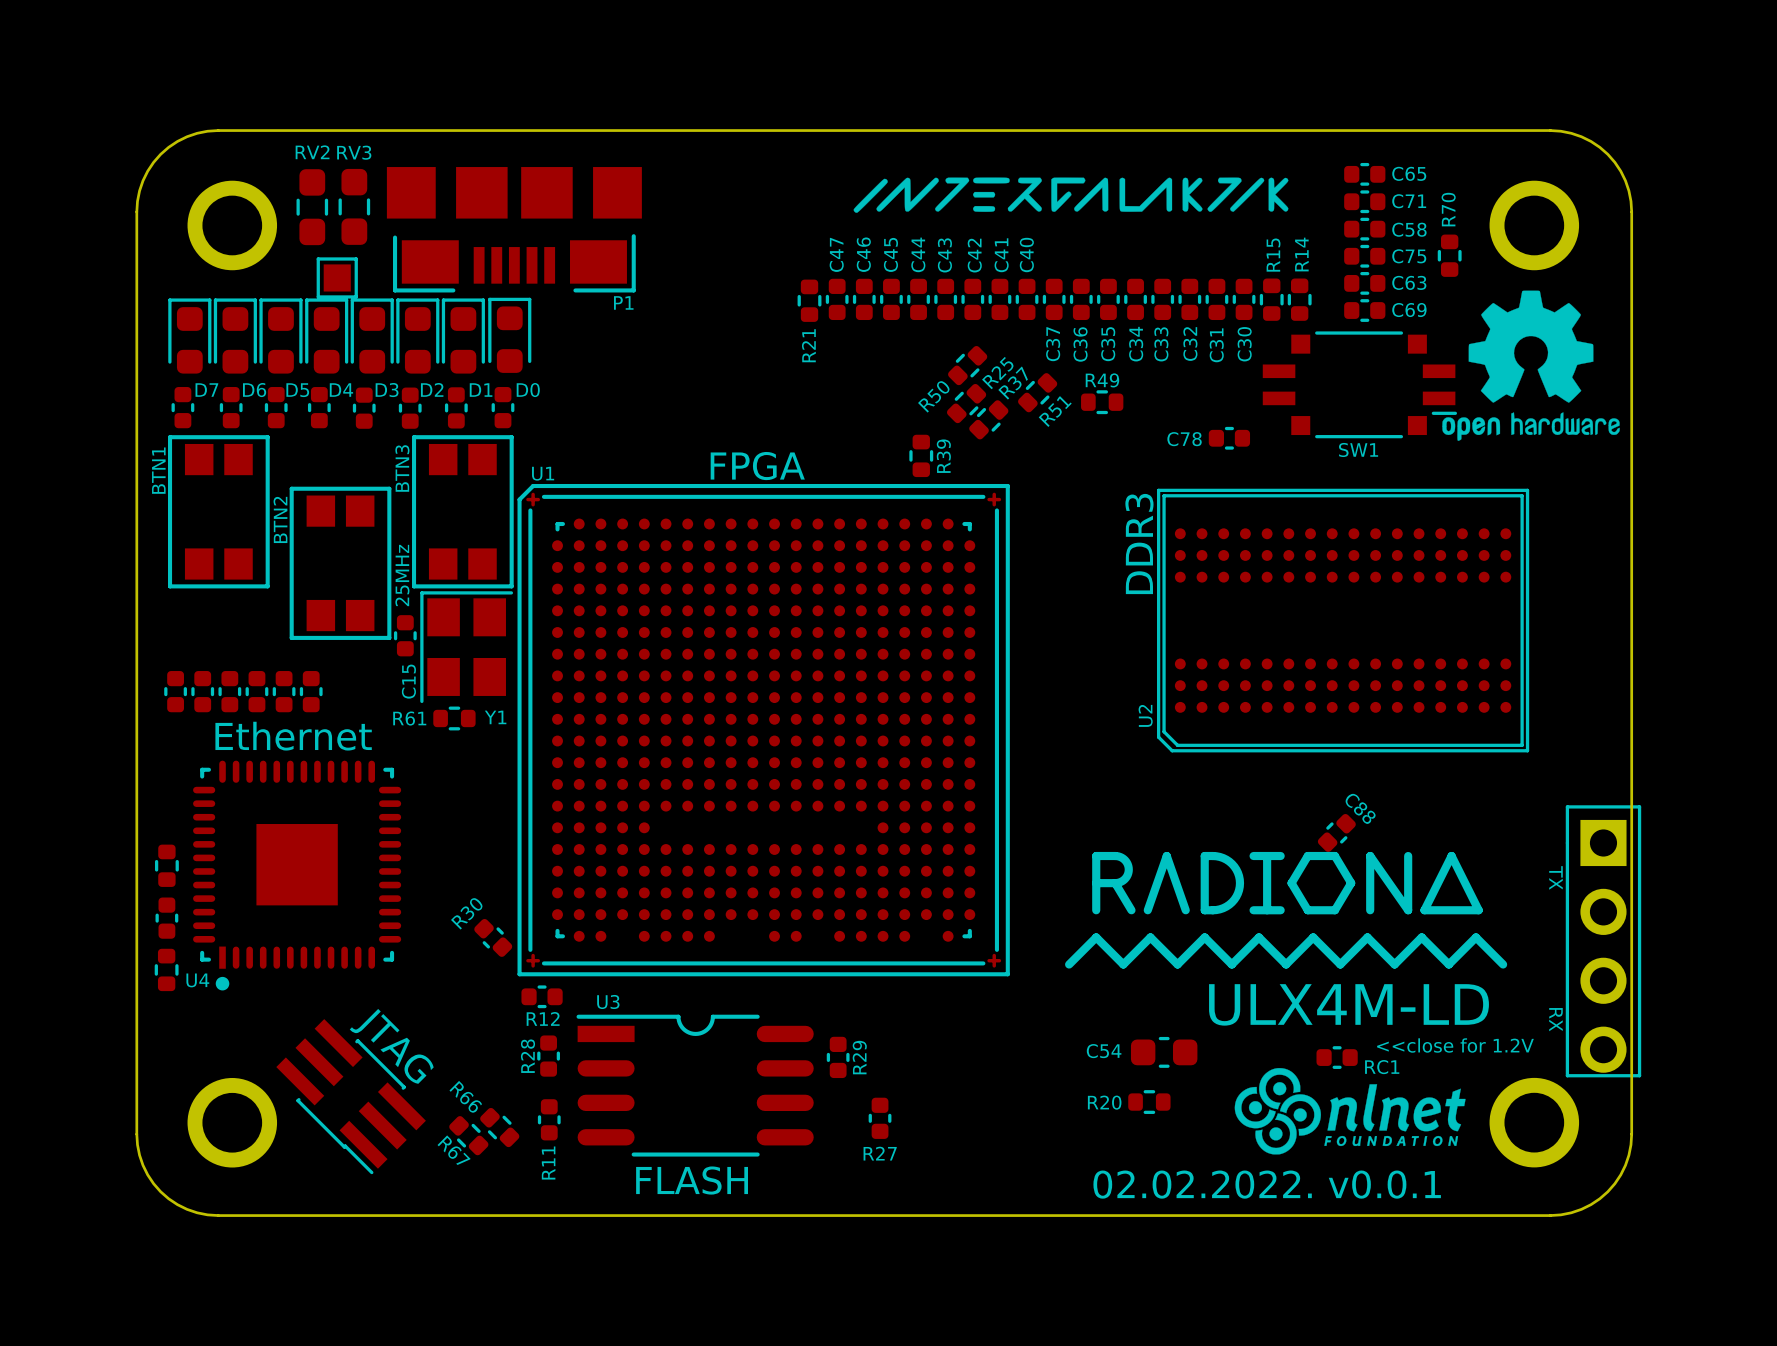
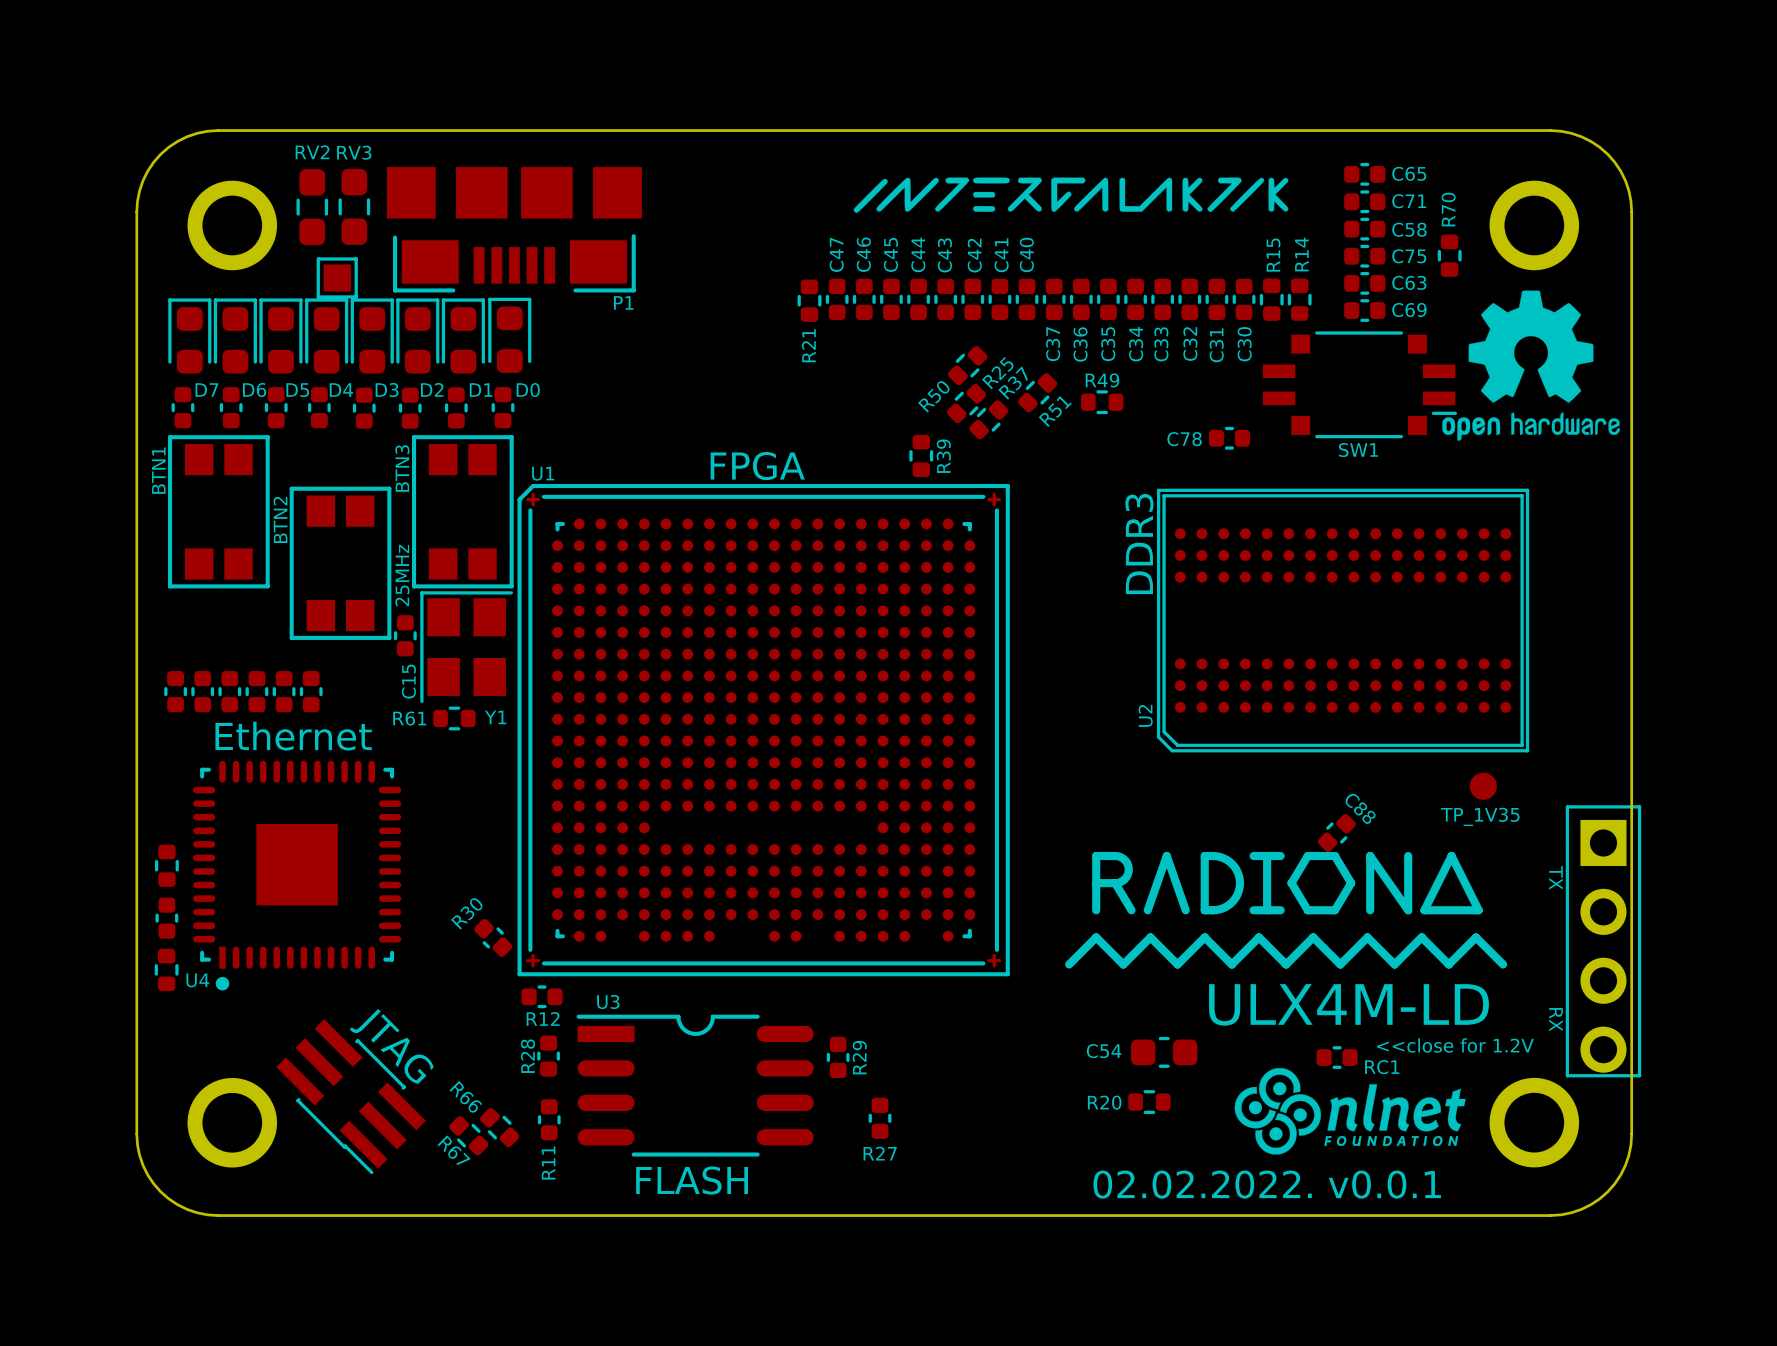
TP_1V35: none -> (1483, 786)

